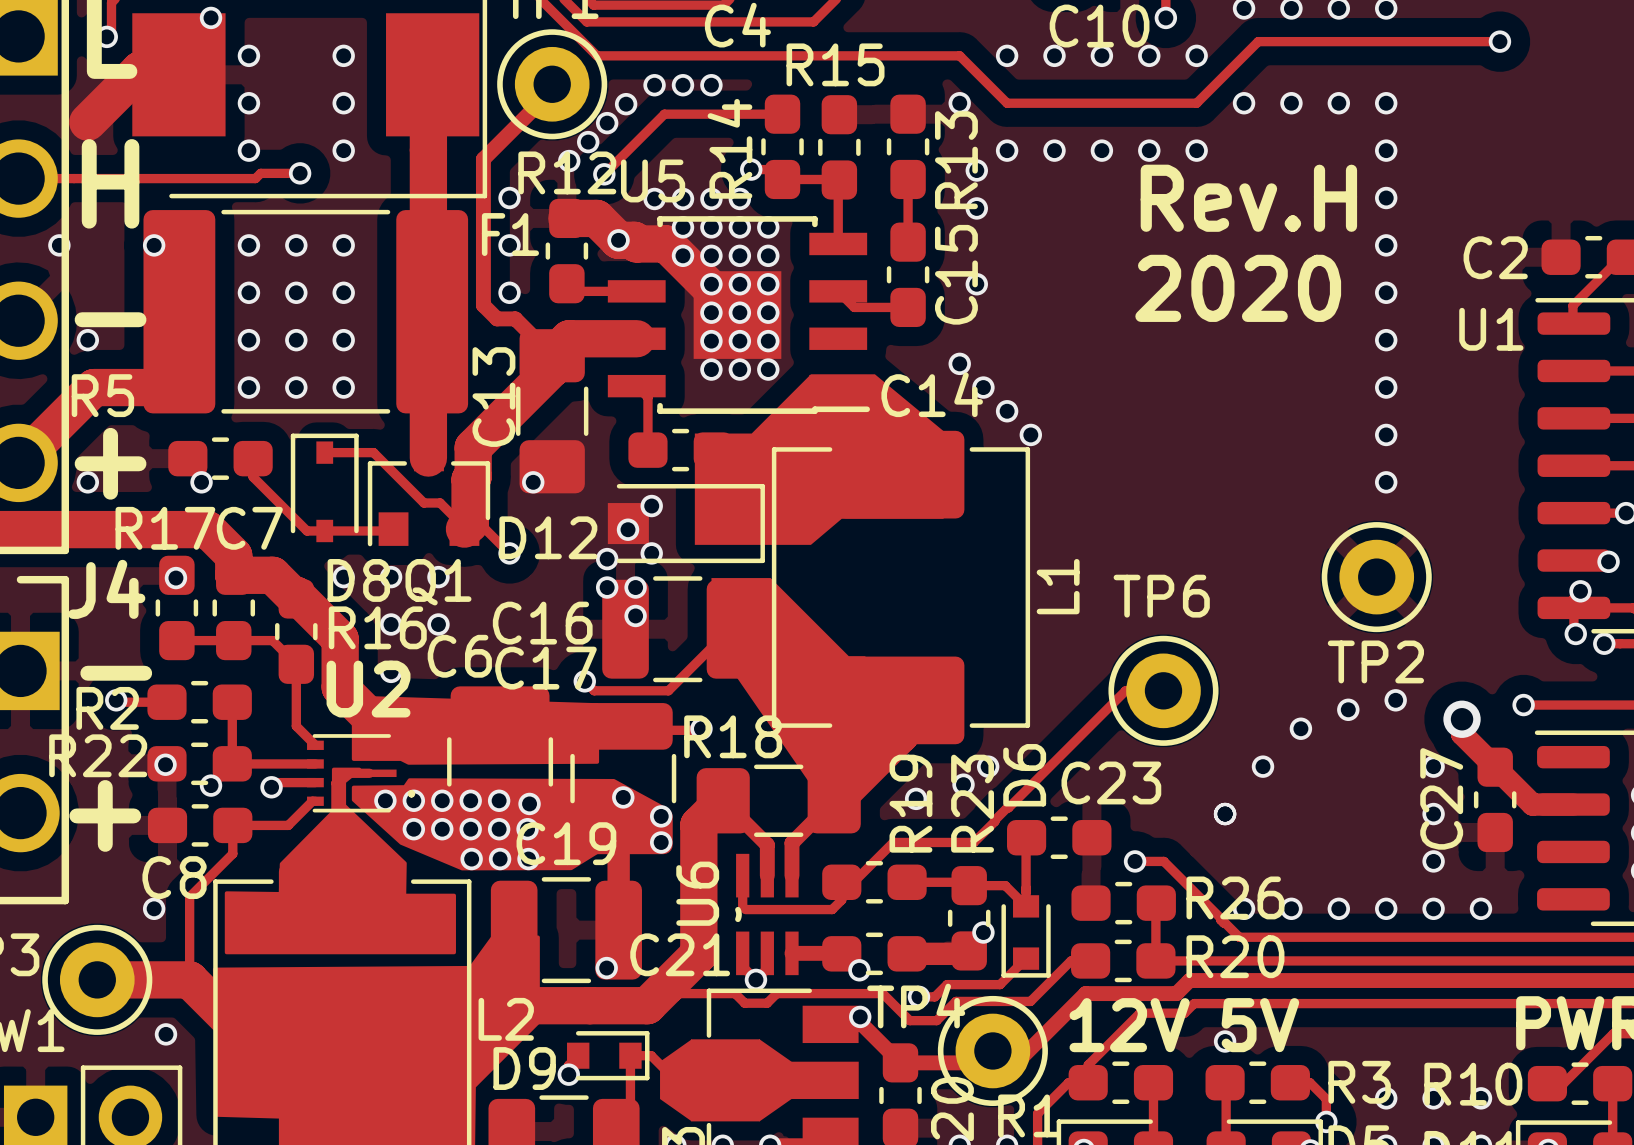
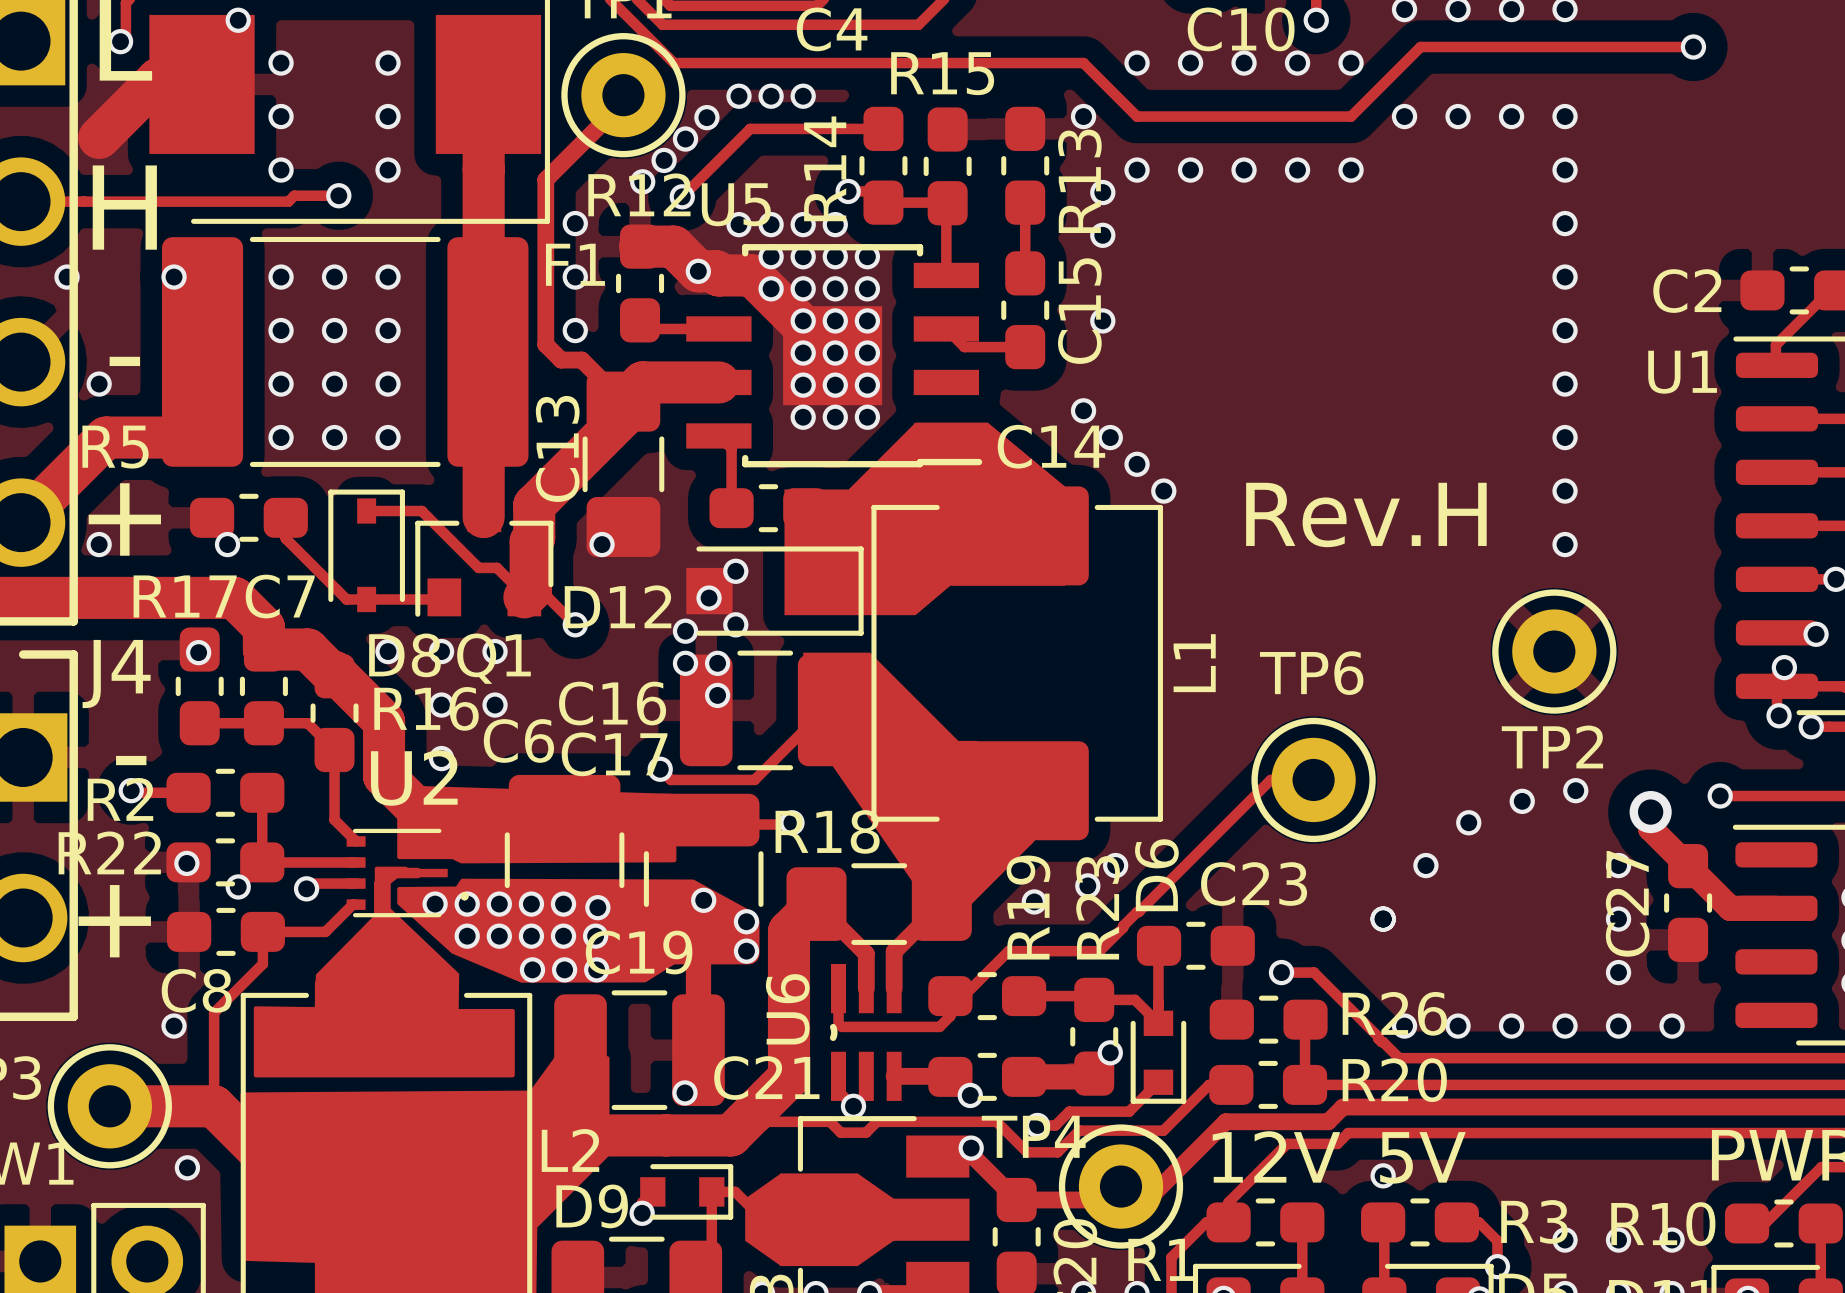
text position: Rev.H (1248, 198) -> Rev.H (1366, 514)
text: 2020 (1238, 288) -> none

